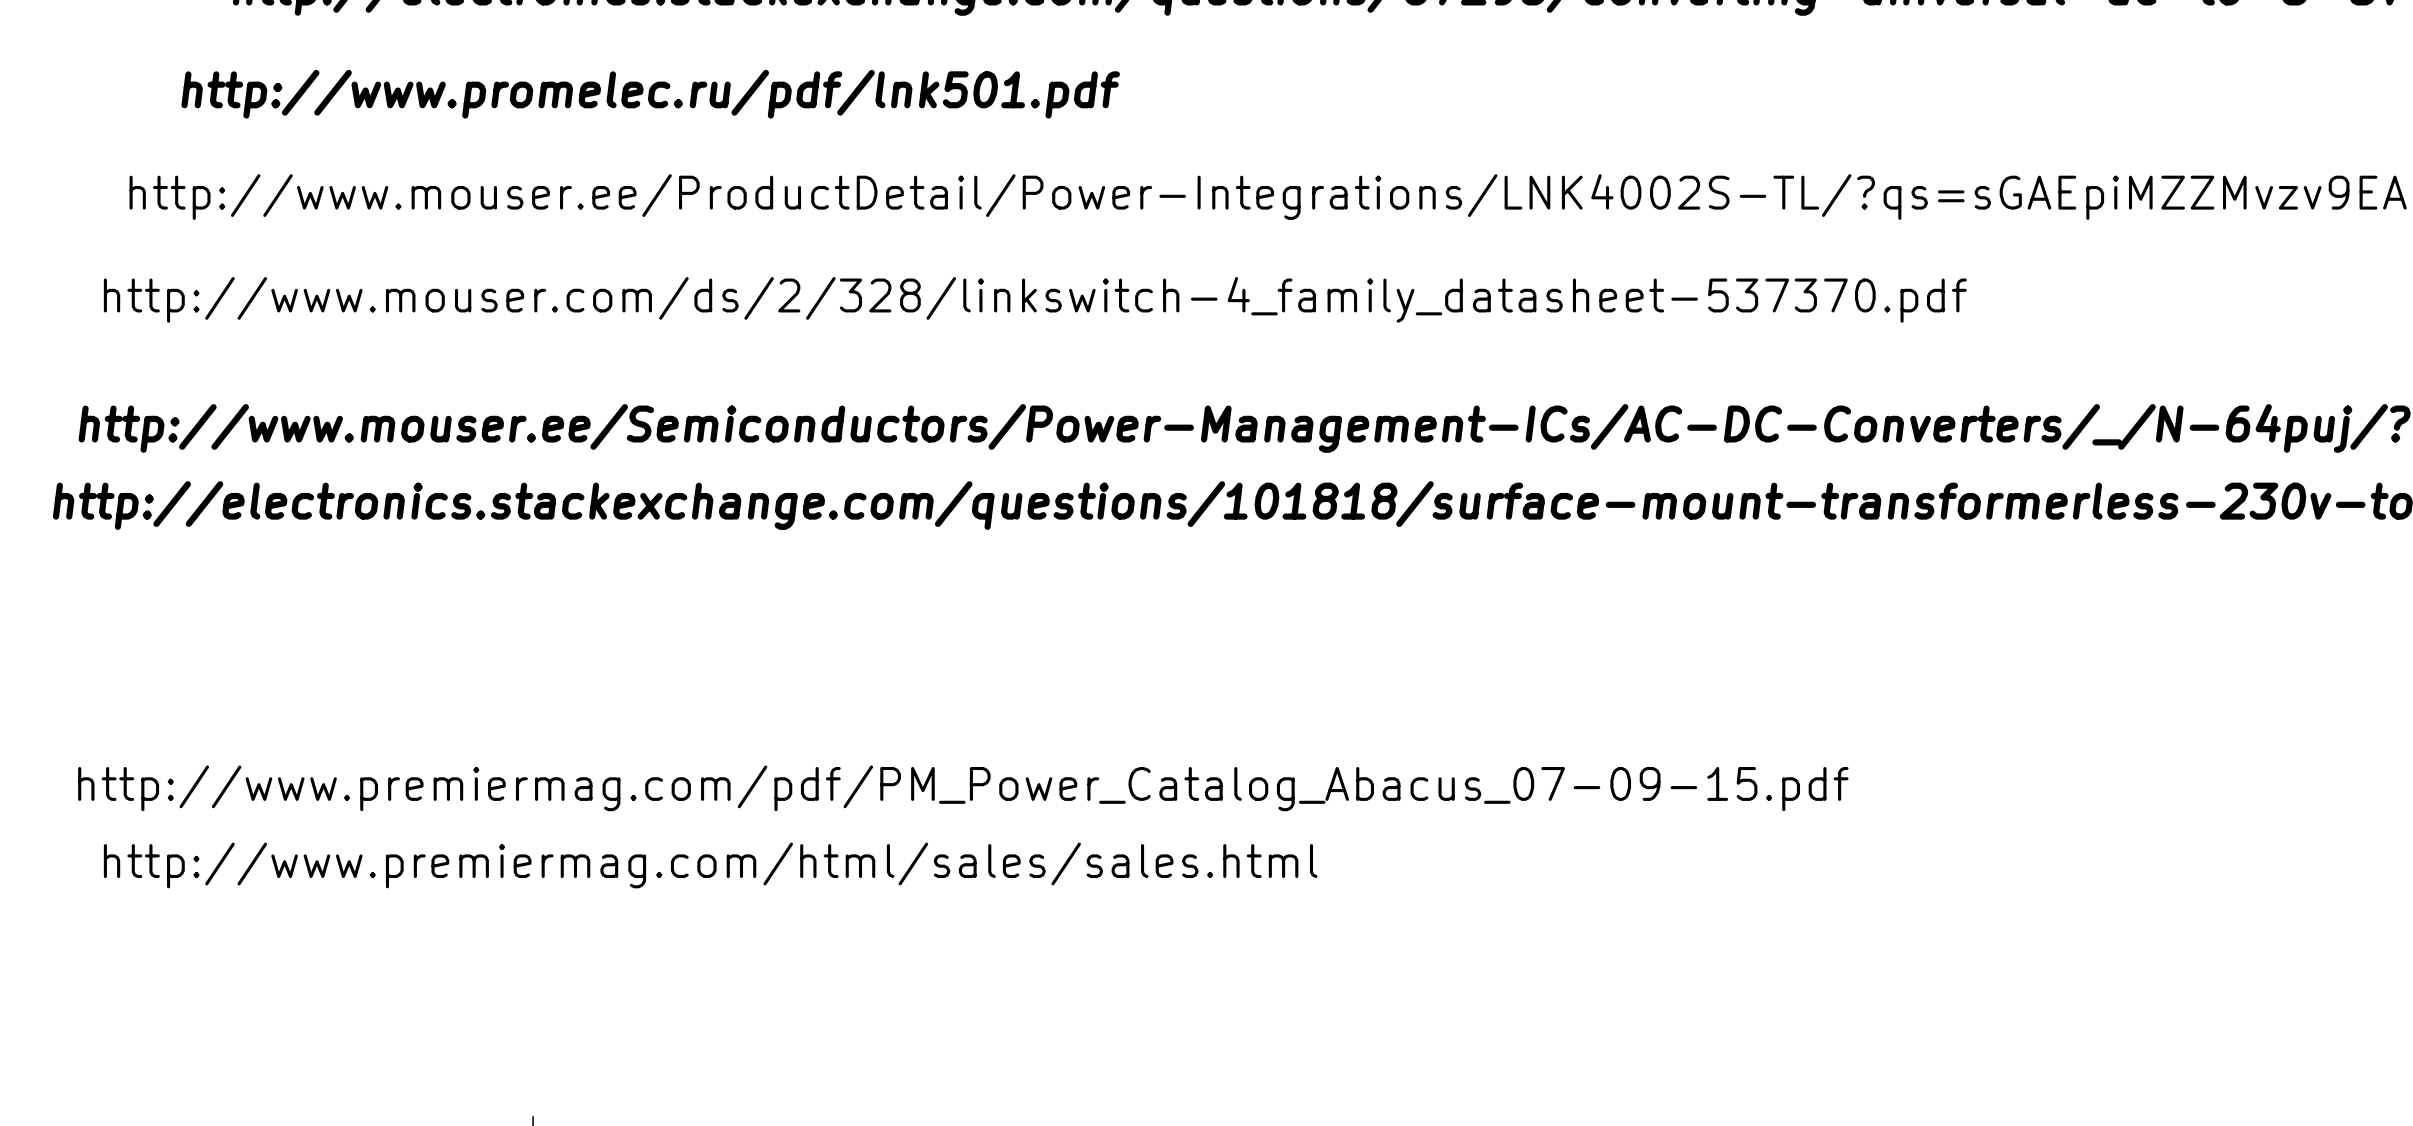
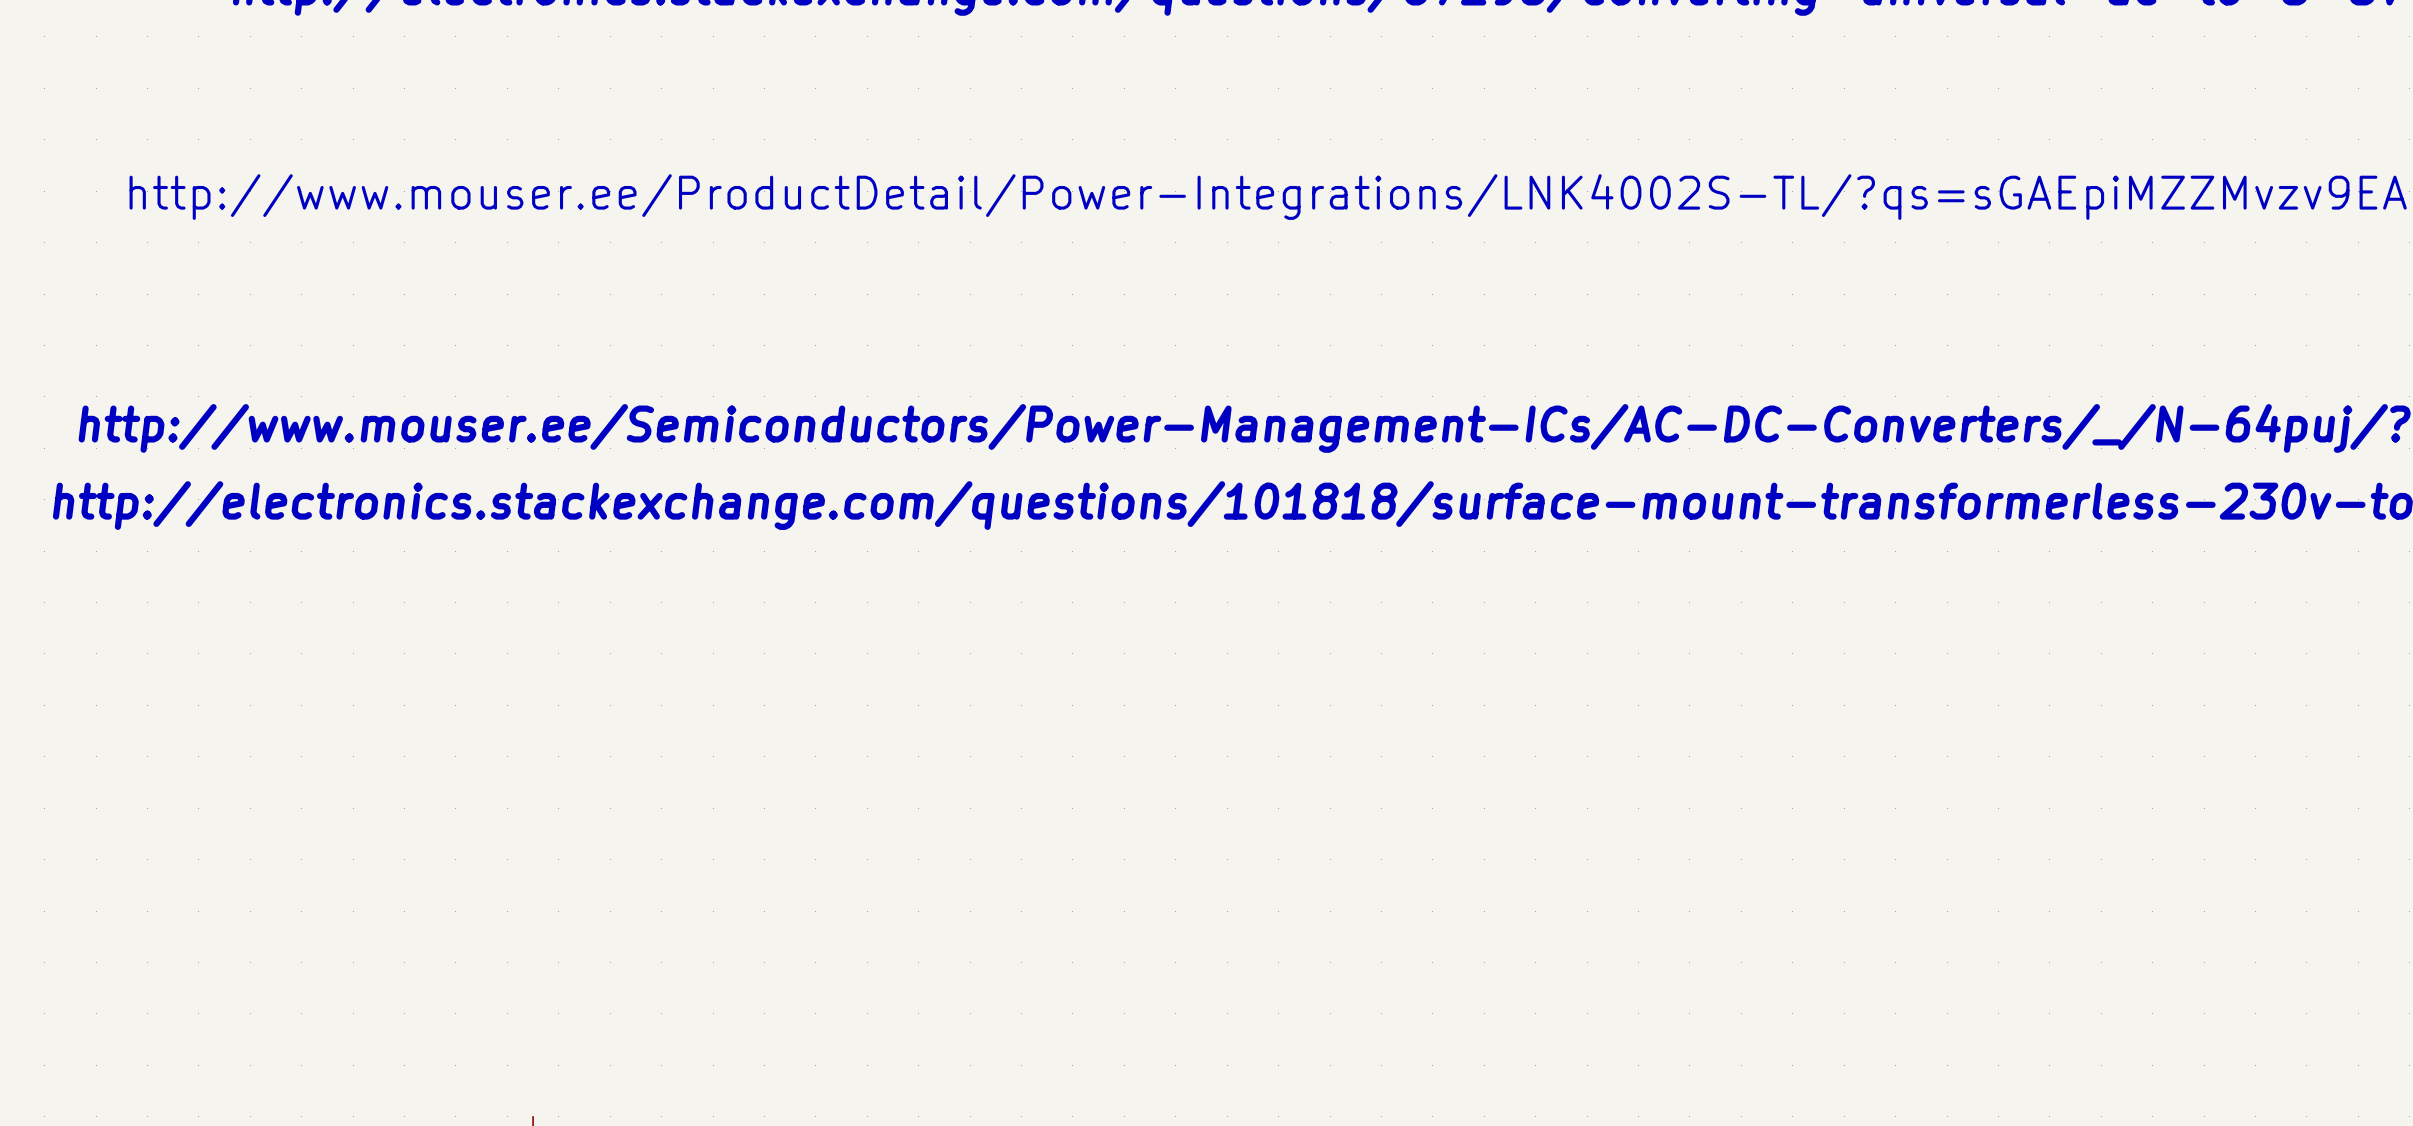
text: http://www.promelec.ru/pdf/lnk501.pdf (650, 94) -> none
text: http://www.mouser.com/ds/2/328/linkswitch-4_family_datasheet-537370.pdf (1035, 299) -> none
text: http://www.premiermag.com/pdf/PM_Power_Catalog_Abacus_07-09-15.pdf (963, 788) -> none
text: http://www.premiermag.com/html/sales/sales.html (710, 865) -> none

